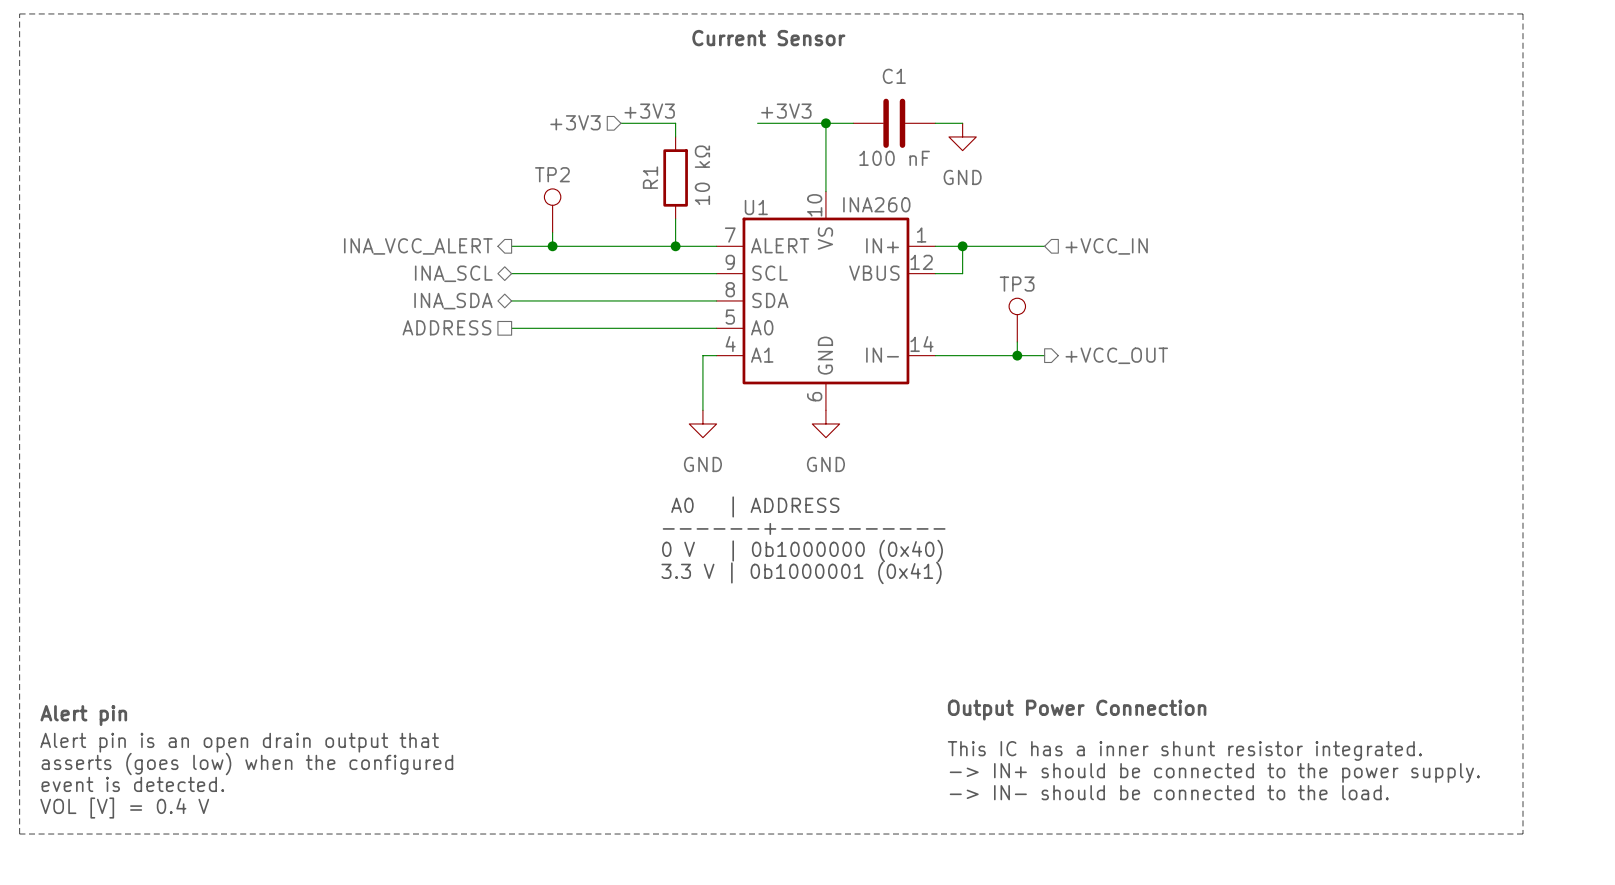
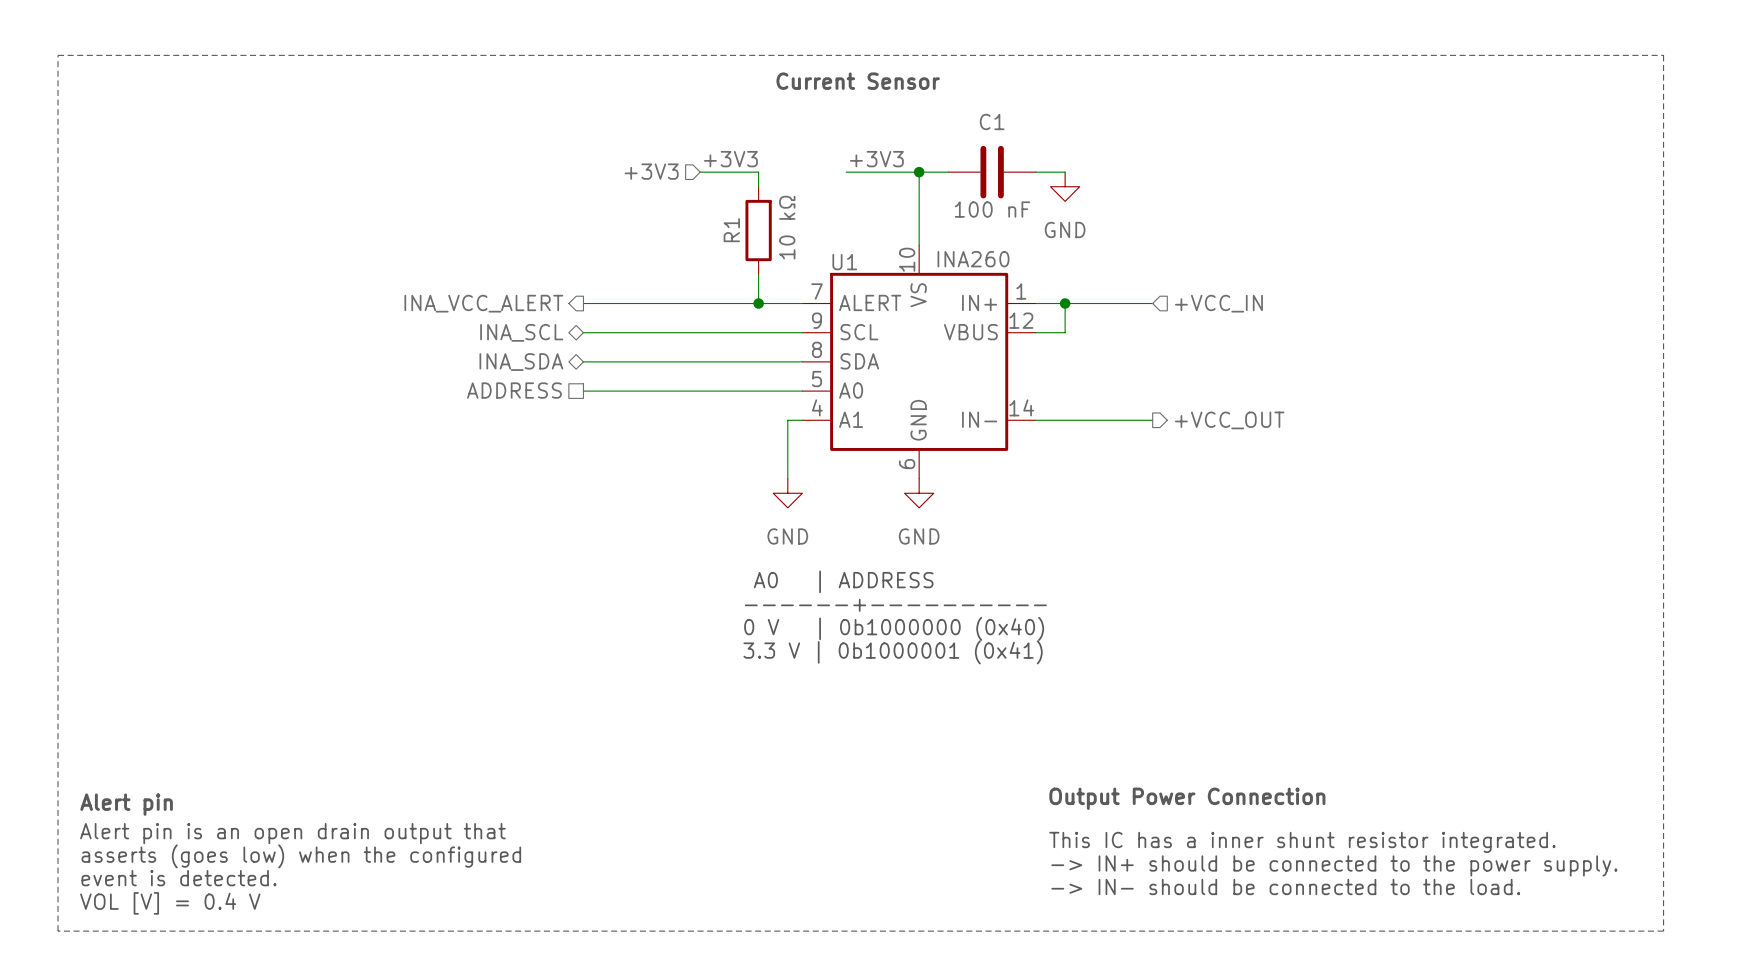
TP2: (552, 210) -> none
wire: (552, 232) (552, 246) -> none
junction: (552, 246) -> none
TP3: (1017, 320) -> none
wire: (1017, 341) (1017, 355) -> none
junction: (1017, 355) -> none

